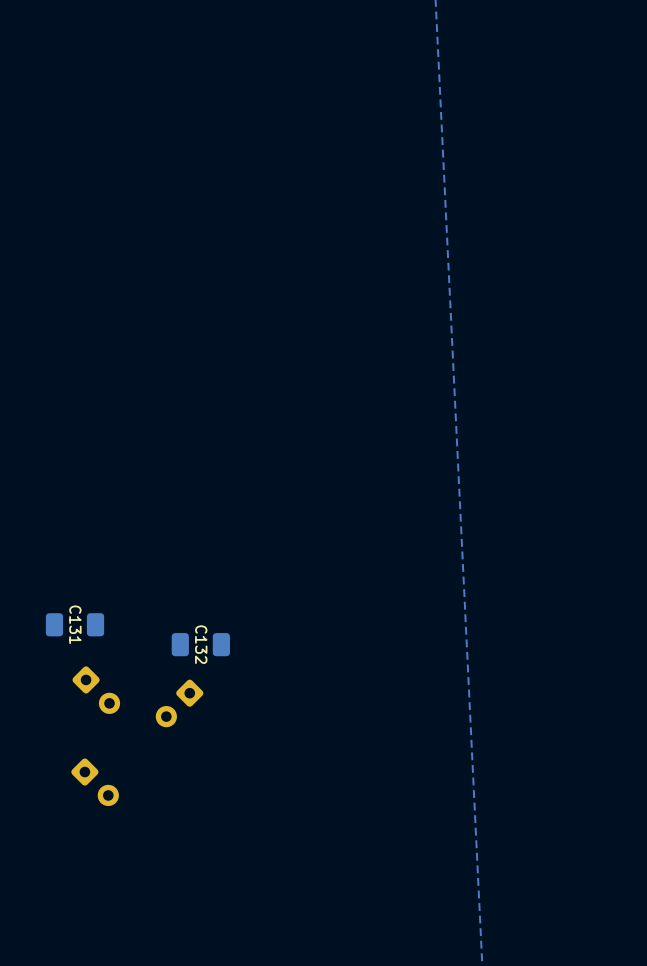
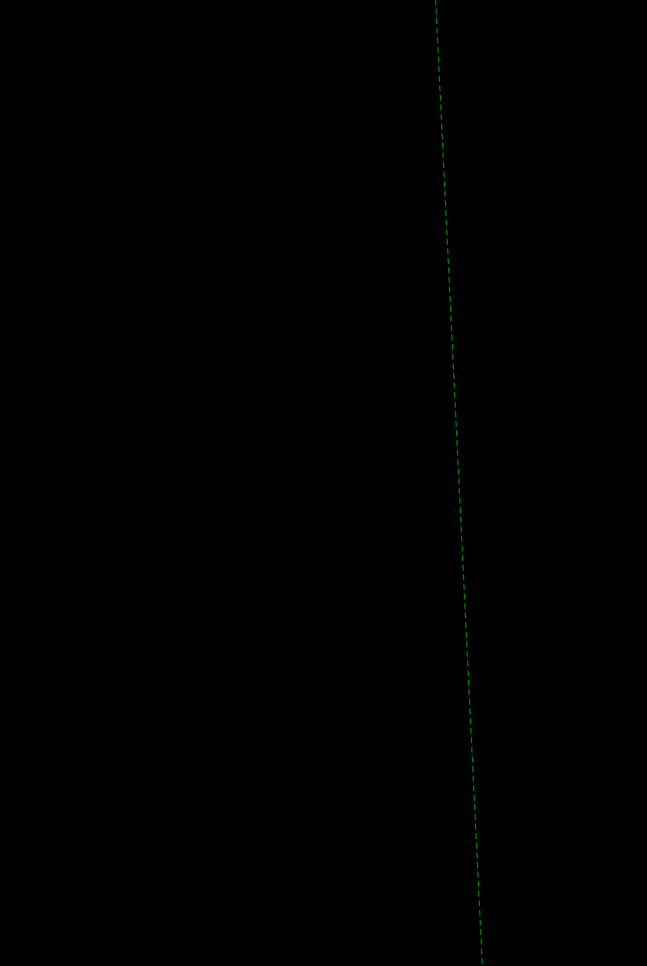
C131: (75, 624) -> none
C132: (200, 644) -> none
part: (96, 690) -> none
part: (179, 703) -> none
part: (95, 782) -> none

